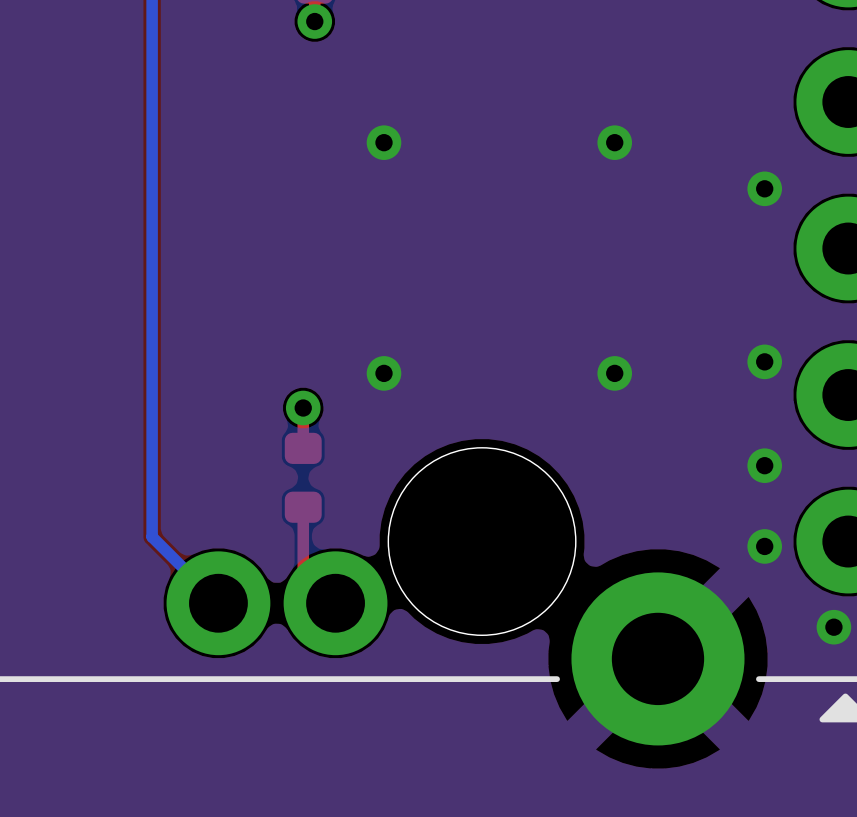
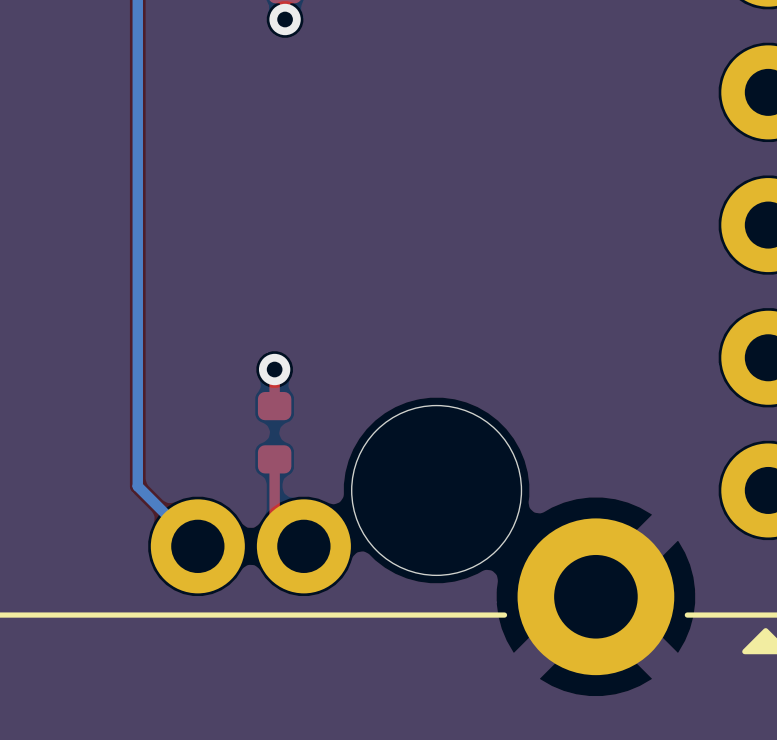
via: (384, 142) -> none
via: (614, 142) -> none
via: (764, 188) -> none
via: (764, 361) -> none
via: (384, 373) -> none
via: (614, 373) -> none
via: (764, 465) -> none
via: (764, 546) -> none
via: (833, 627) -> none

